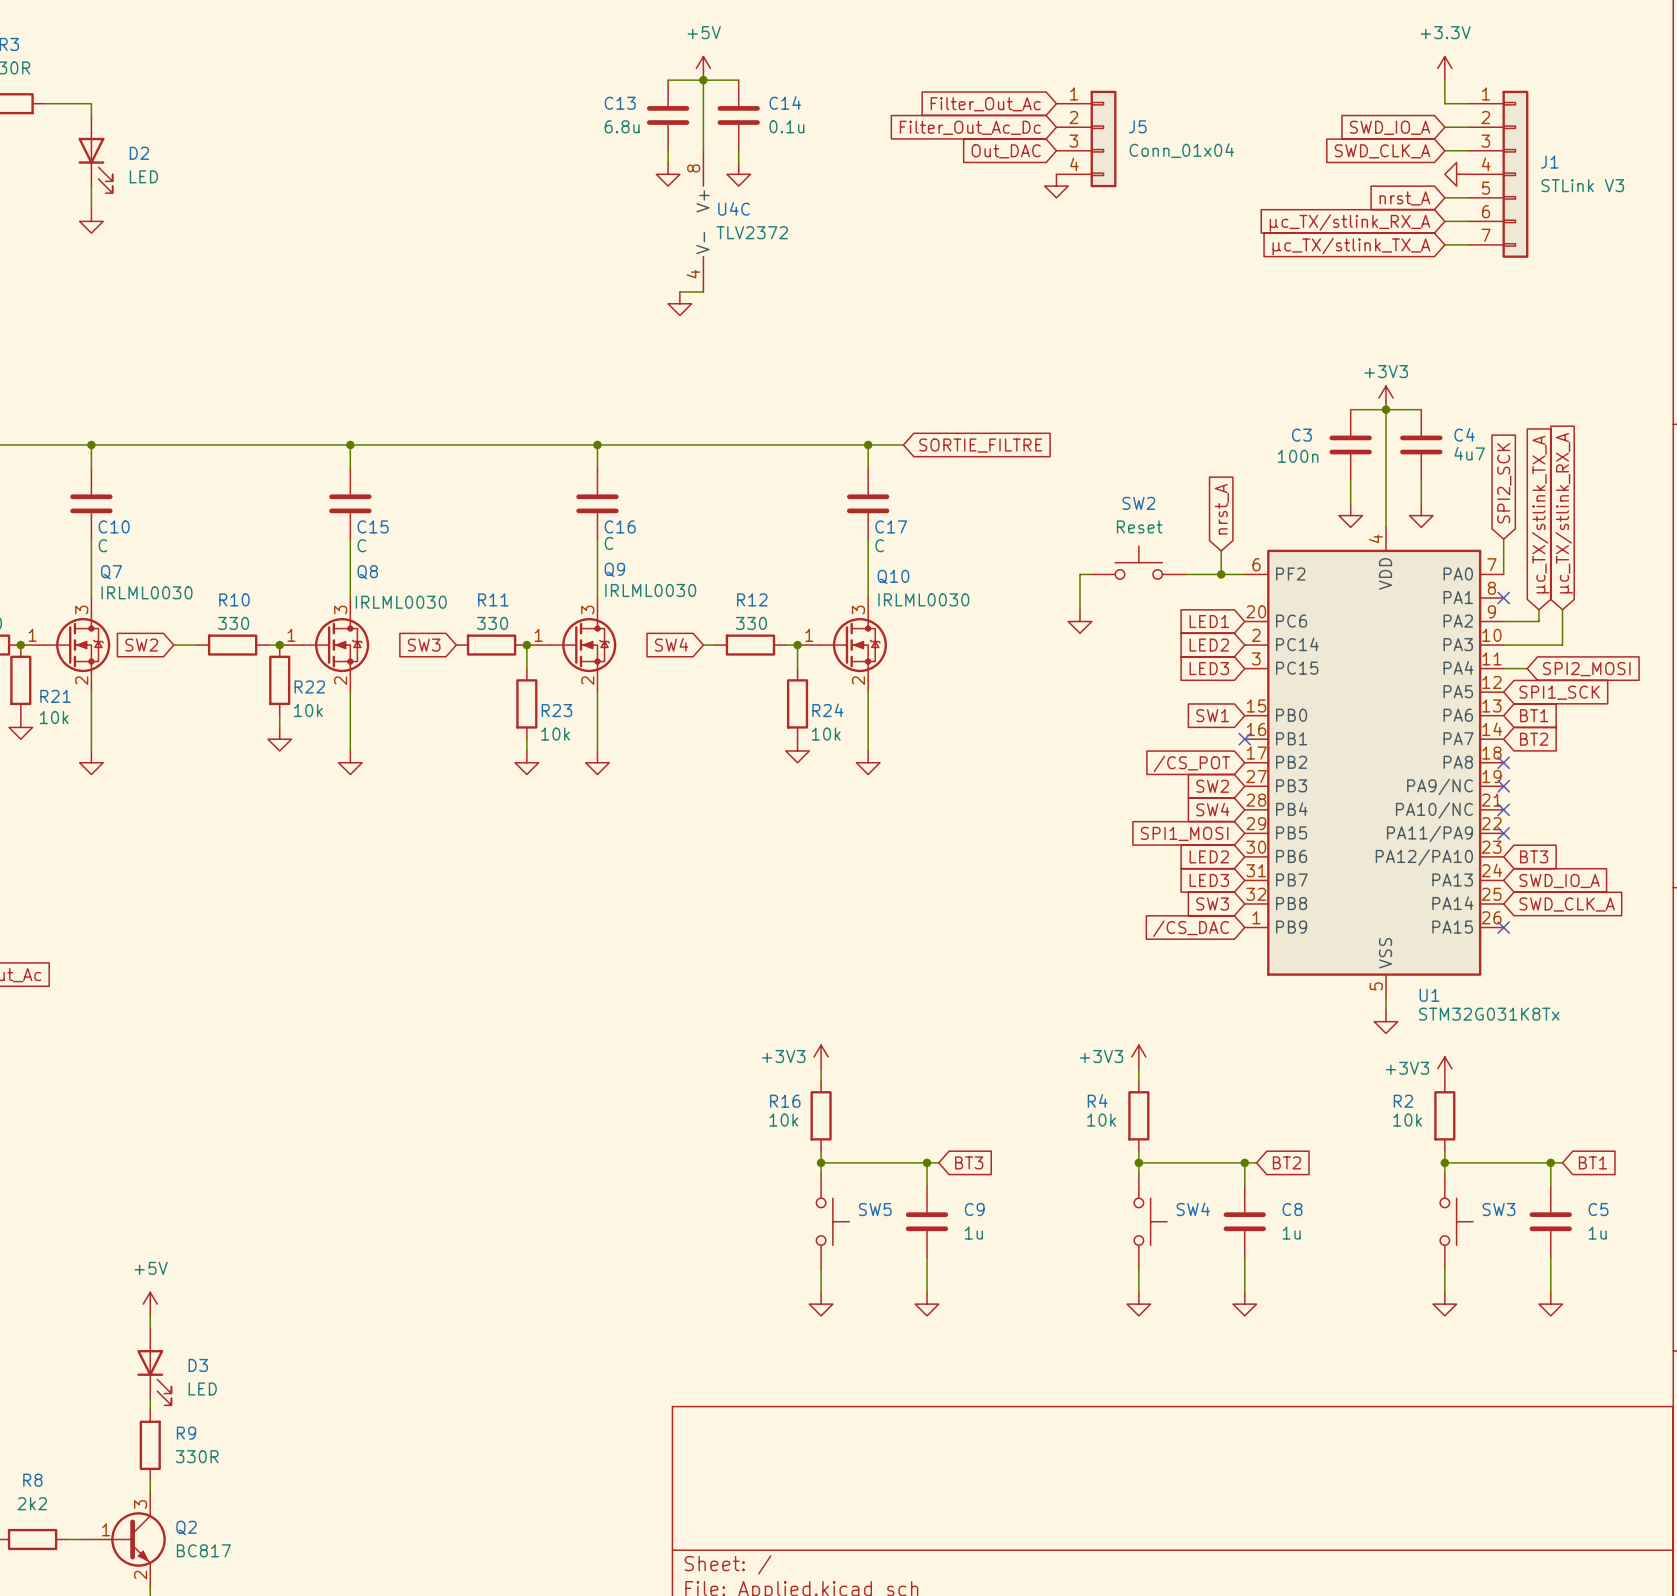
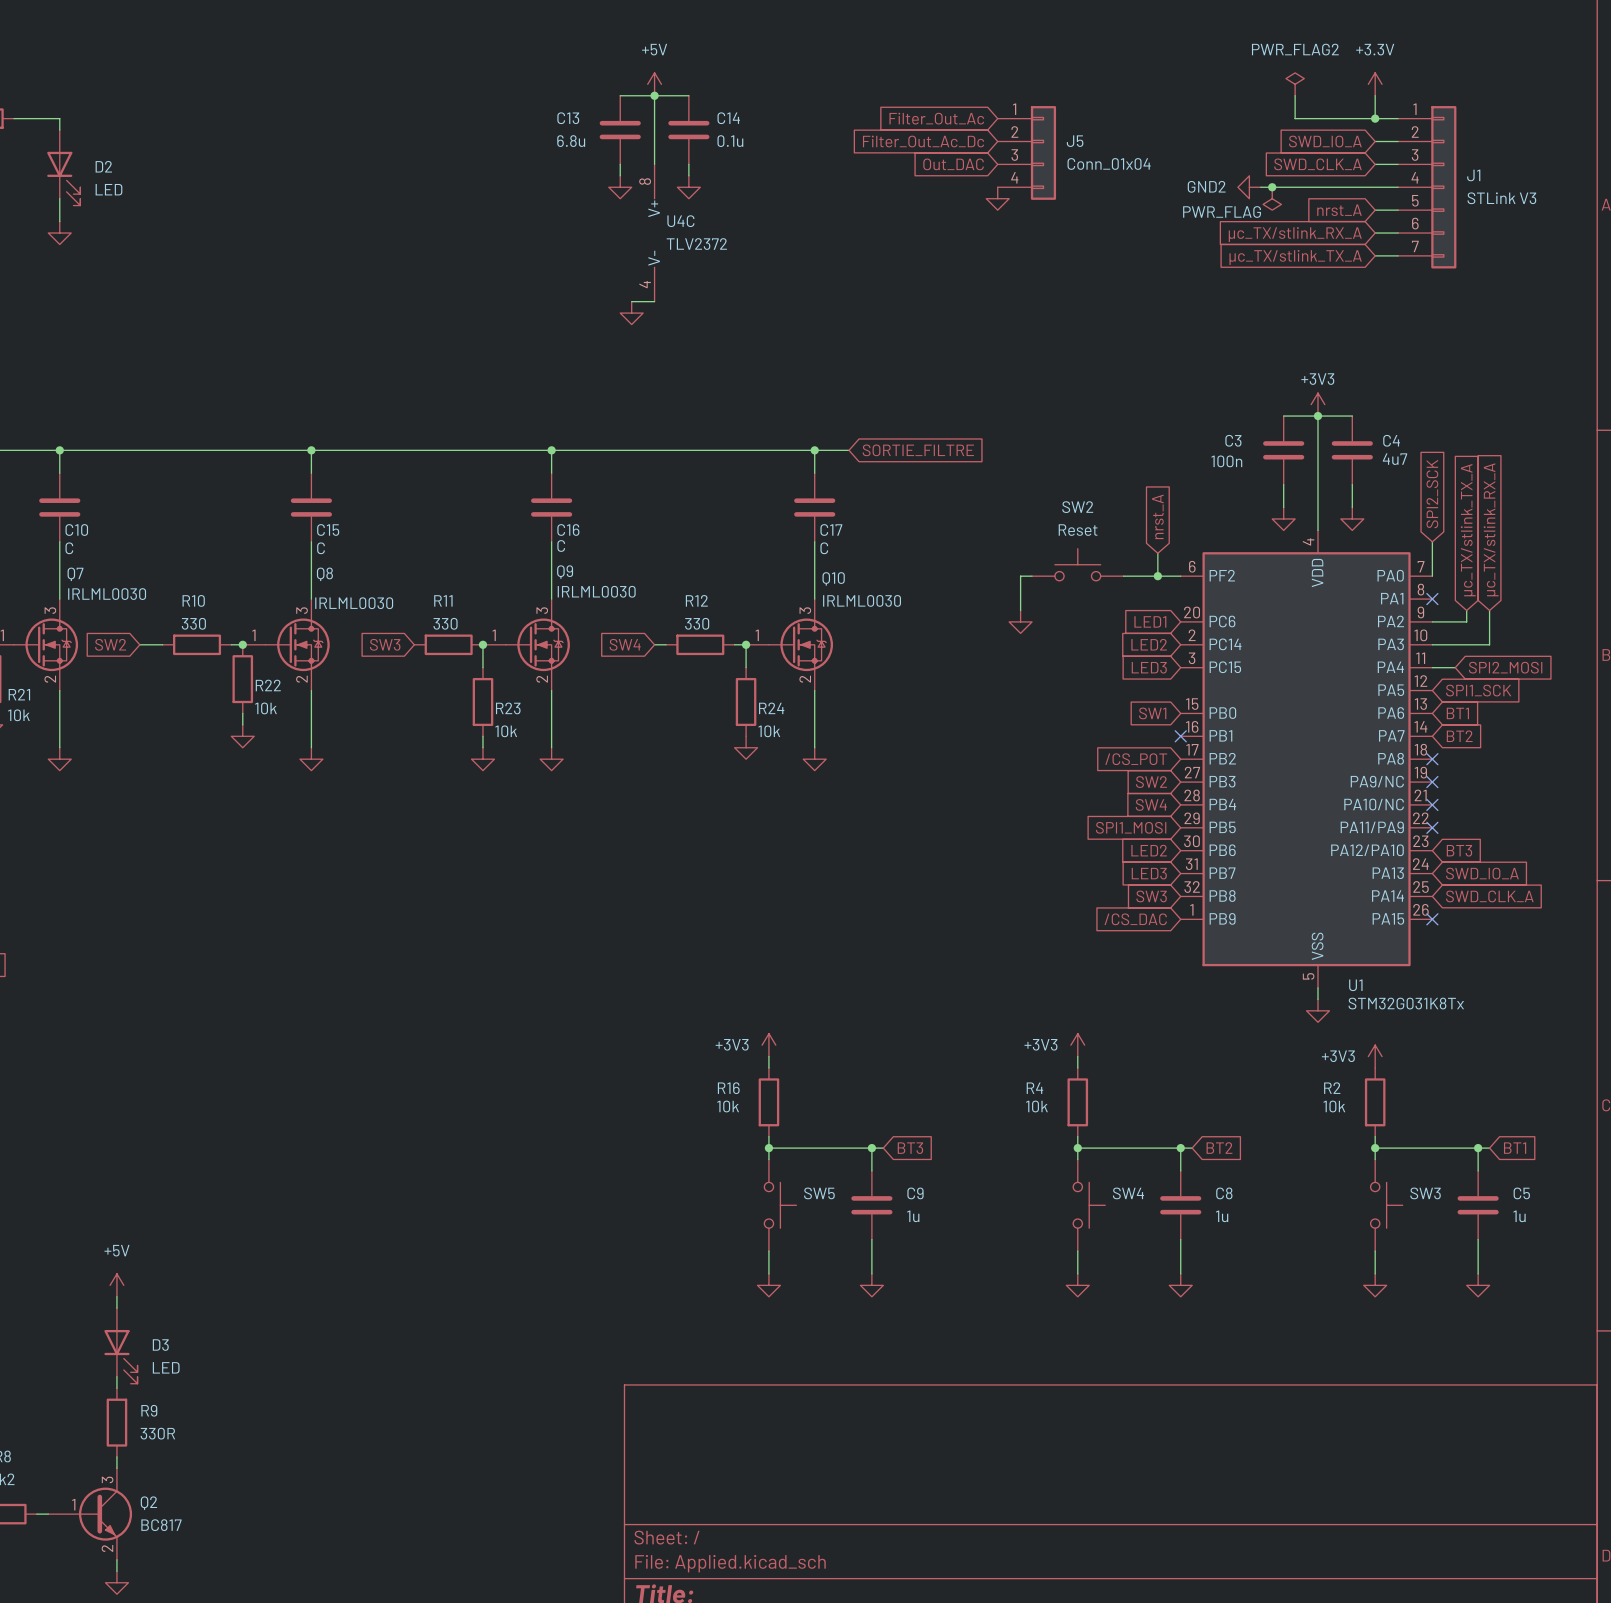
power symbol: none -> PWR_FLAG2 (1295, 84)
wire: none -> (1295, 95) (1295, 118) (1375, 118)
junction: none -> (1375, 118)
power symbol: none -> GND2 (1249, 187)
wire: none -> (1260, 187) (1398, 187)
junction: none -> (1272, 187)
power symbol: (1456, 174) -> none
power symbol: none -> PWR_FLAG (1272, 198)

